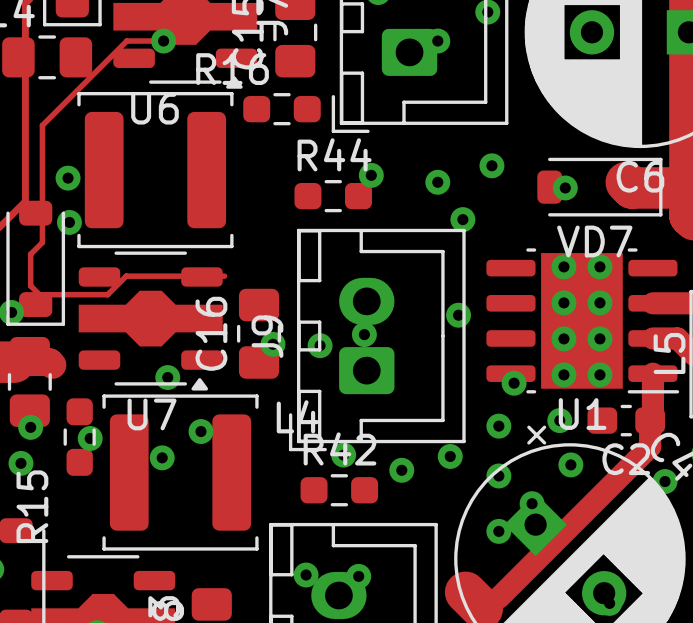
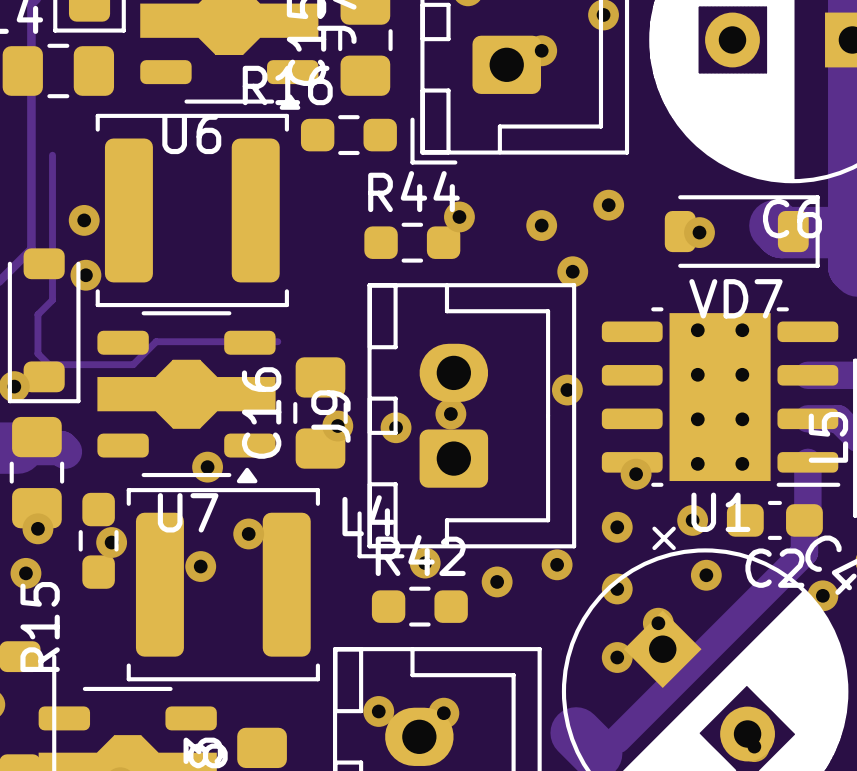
track: (163, 41) (126, 41) (42, 125) -> none
via: (163, 41) -> none

